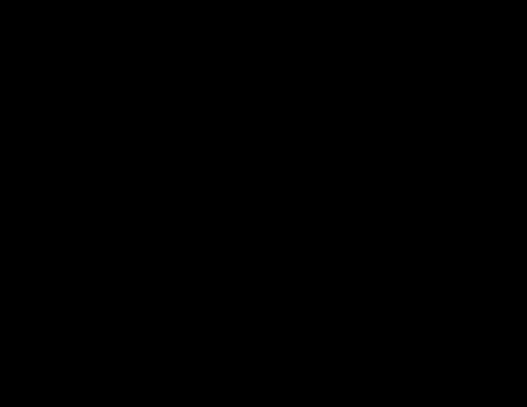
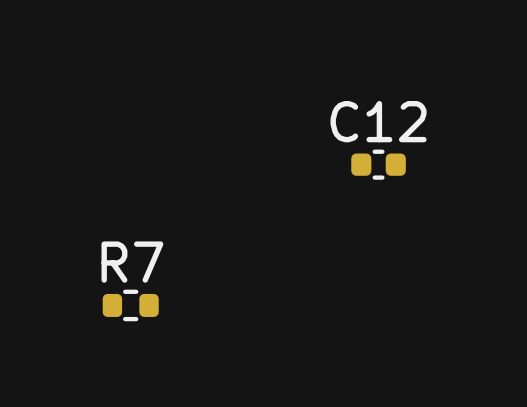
C12: none -> (378, 164)
R7: none -> (130, 305)

